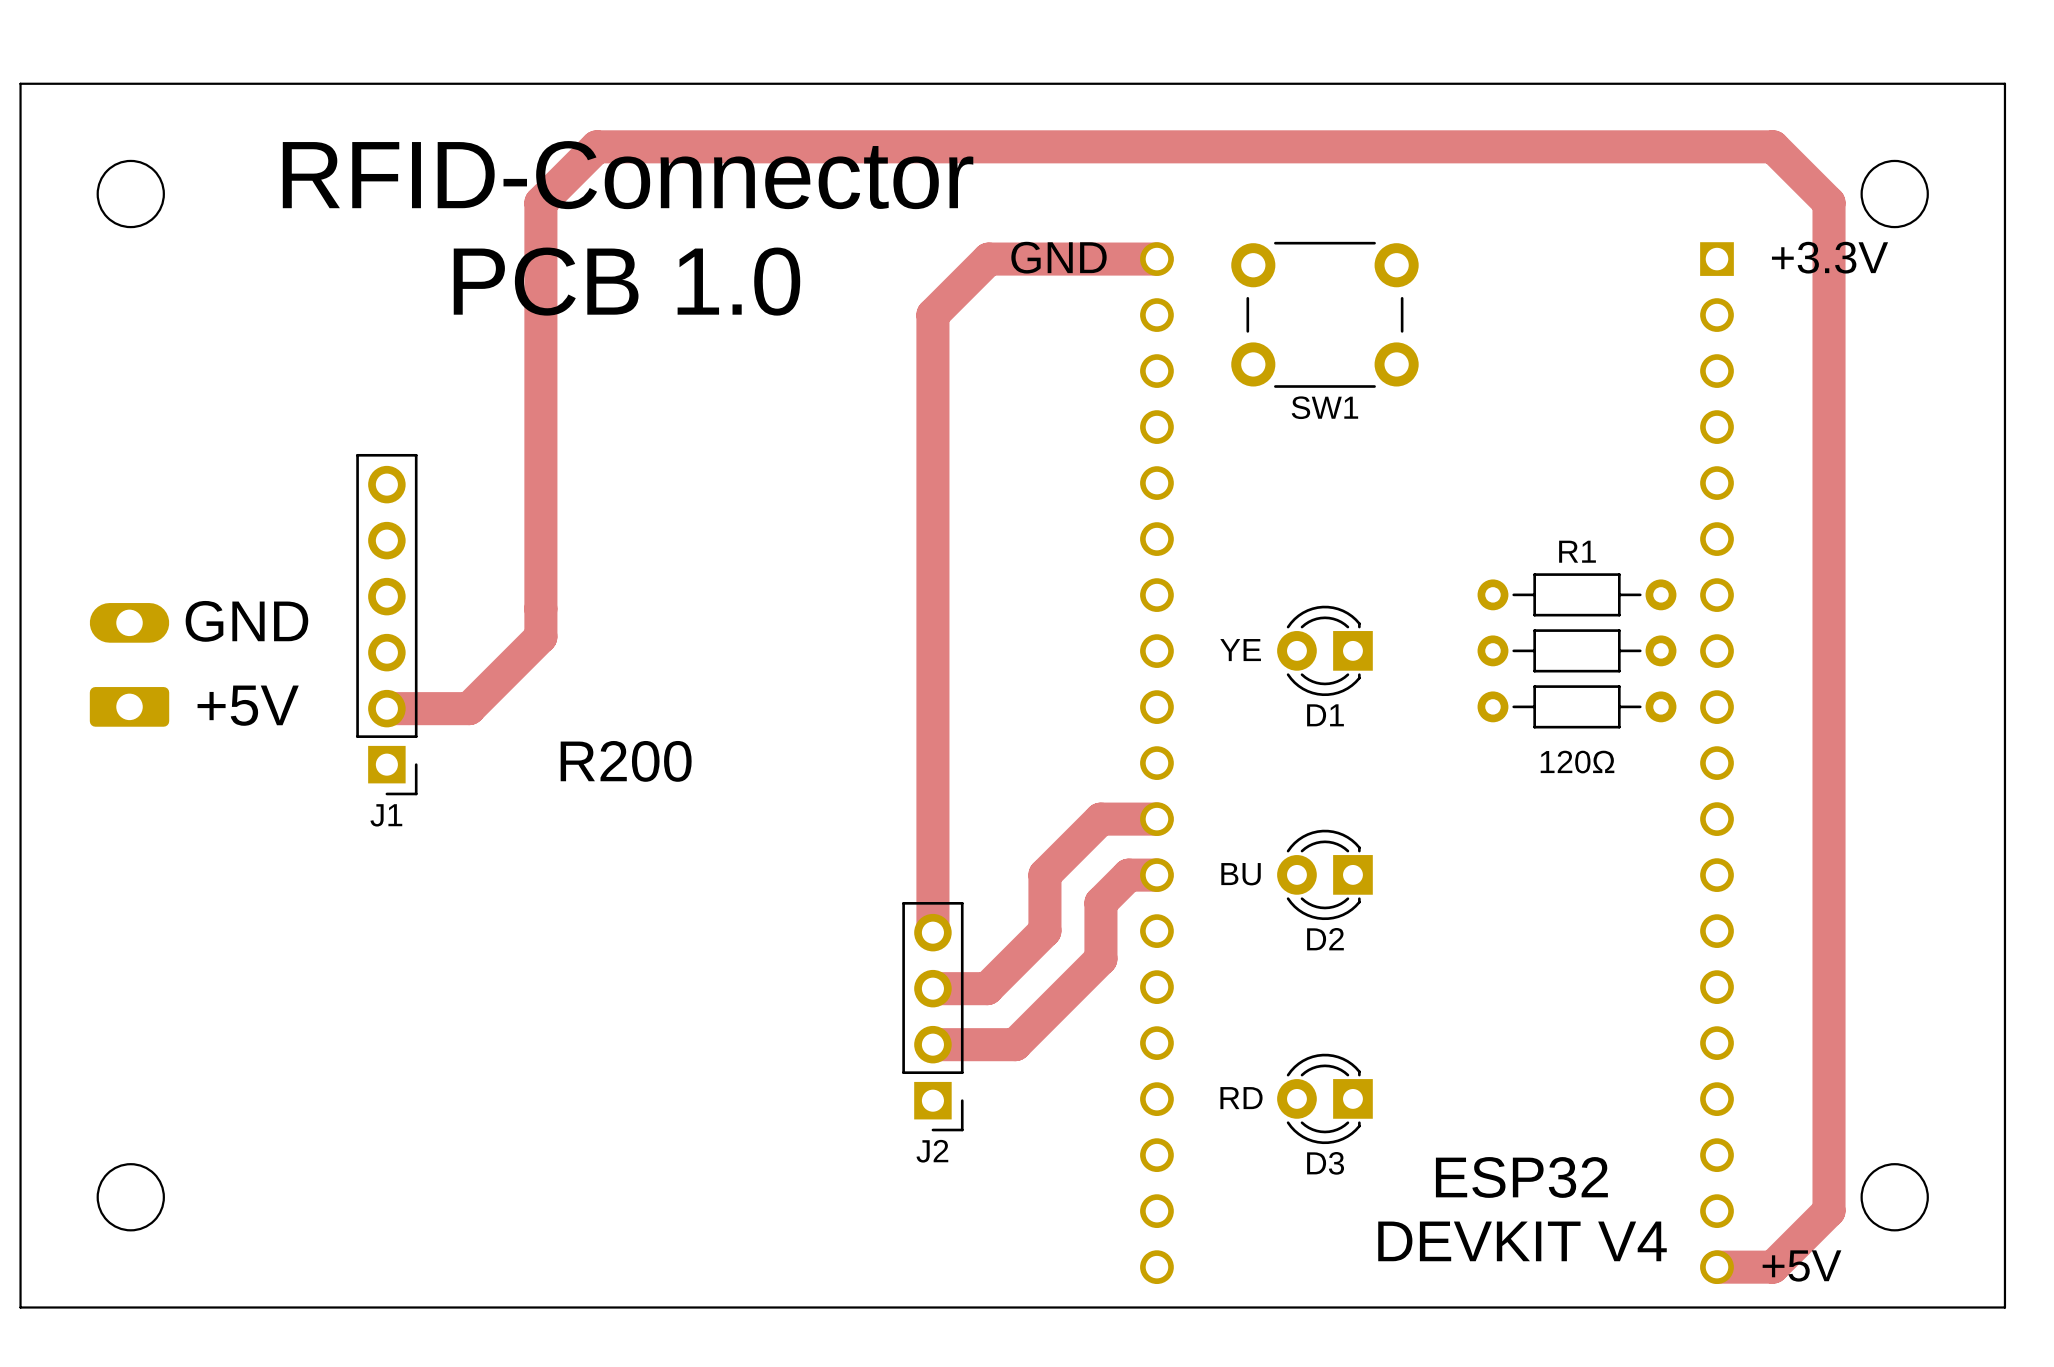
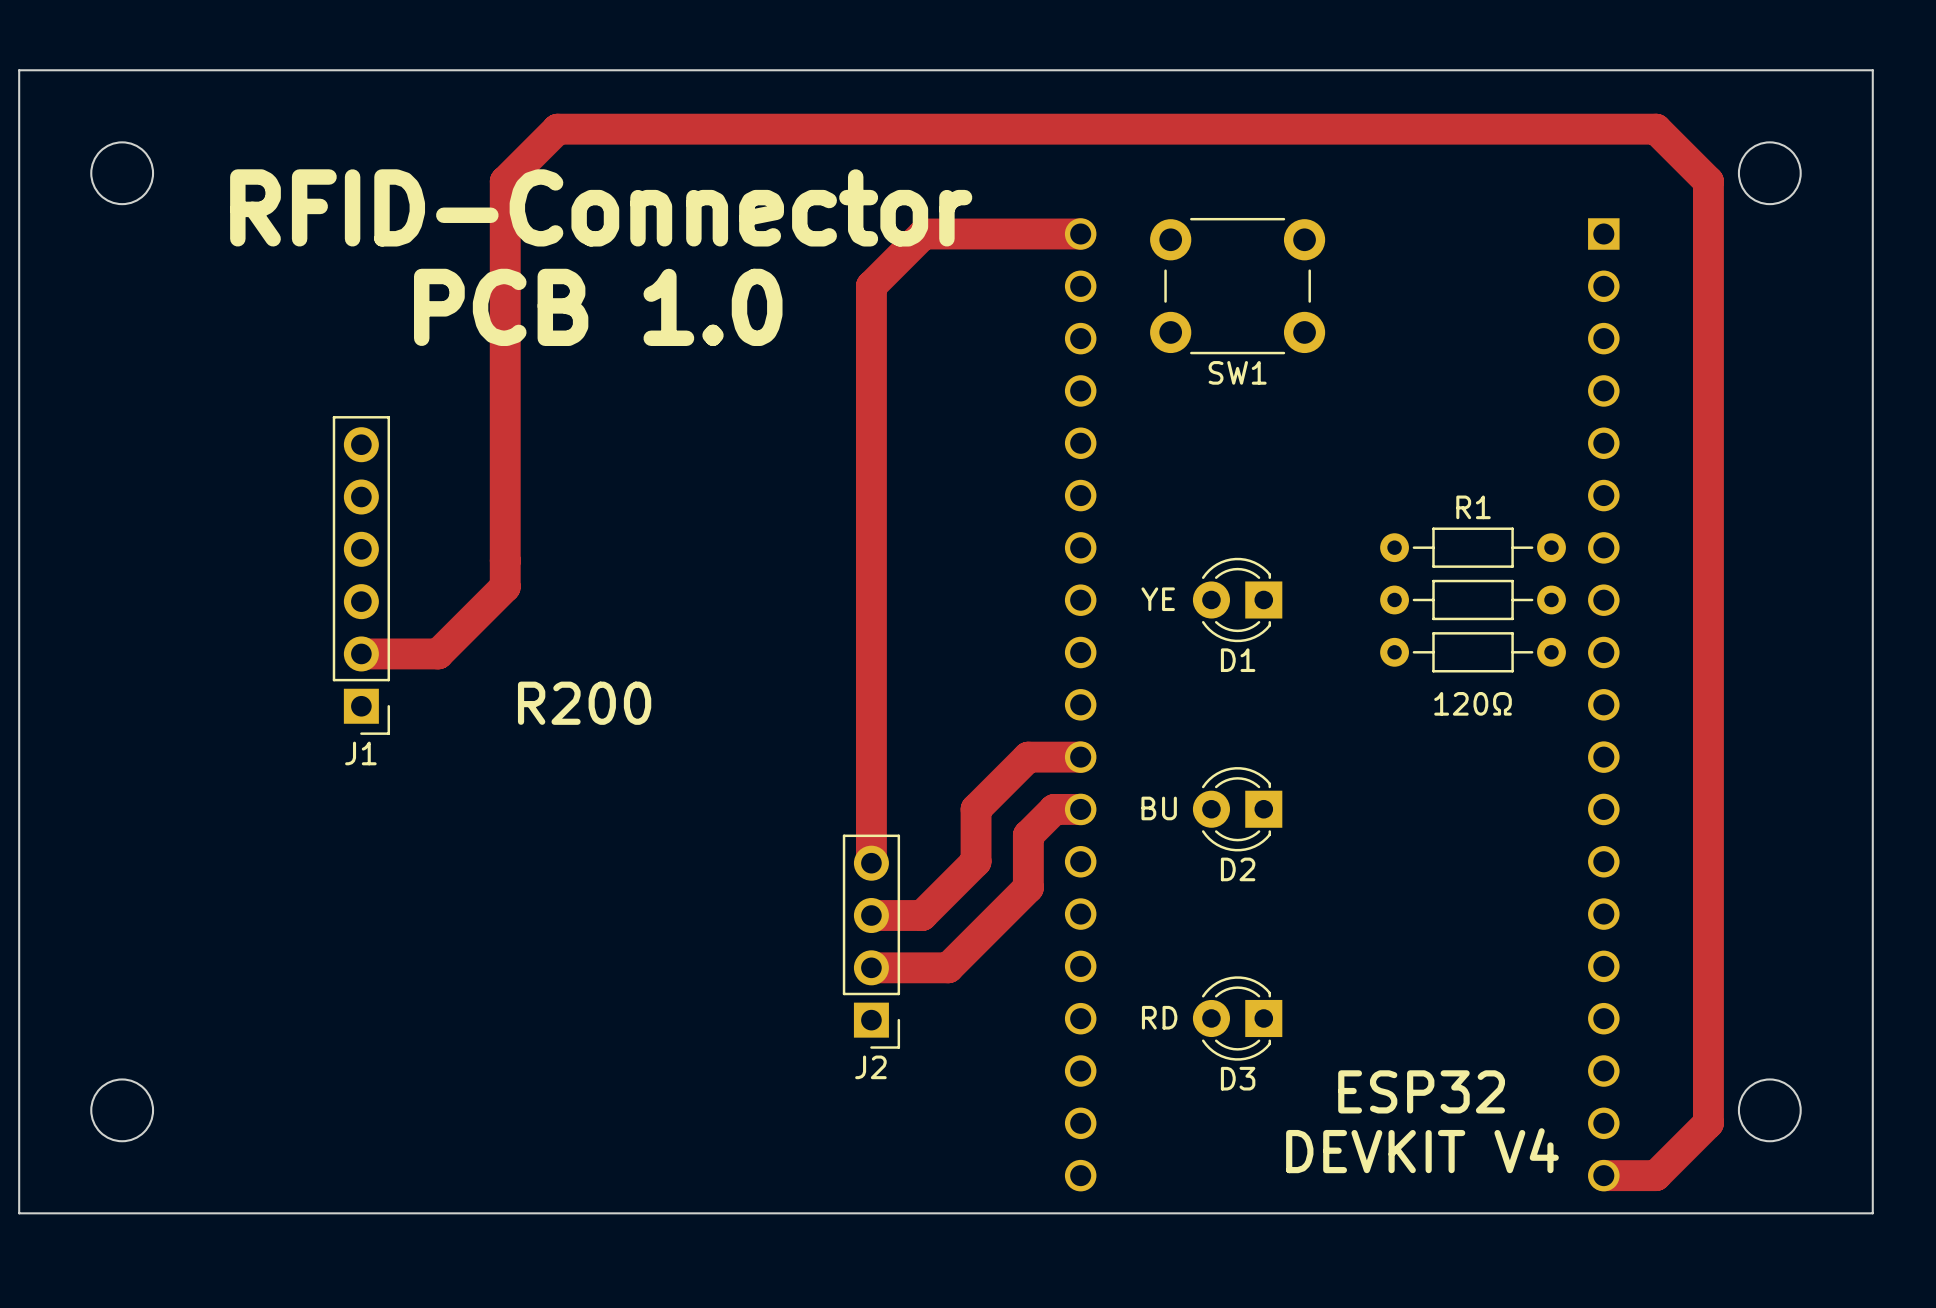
text position: RFID-Connector (628, 175) -> RFID-Connector (601, 207)
text: GND (1059, 257) -> none
text: +3.3V (1830, 257) -> none
text position: PCB 1.0 (626, 281) -> PCB 1.0 (598, 307)
text: GND (246, 621) -> none
part: (129, 664) -> none
text: +5V (248, 705) -> none
text: +5V (1802, 1265) -> none

